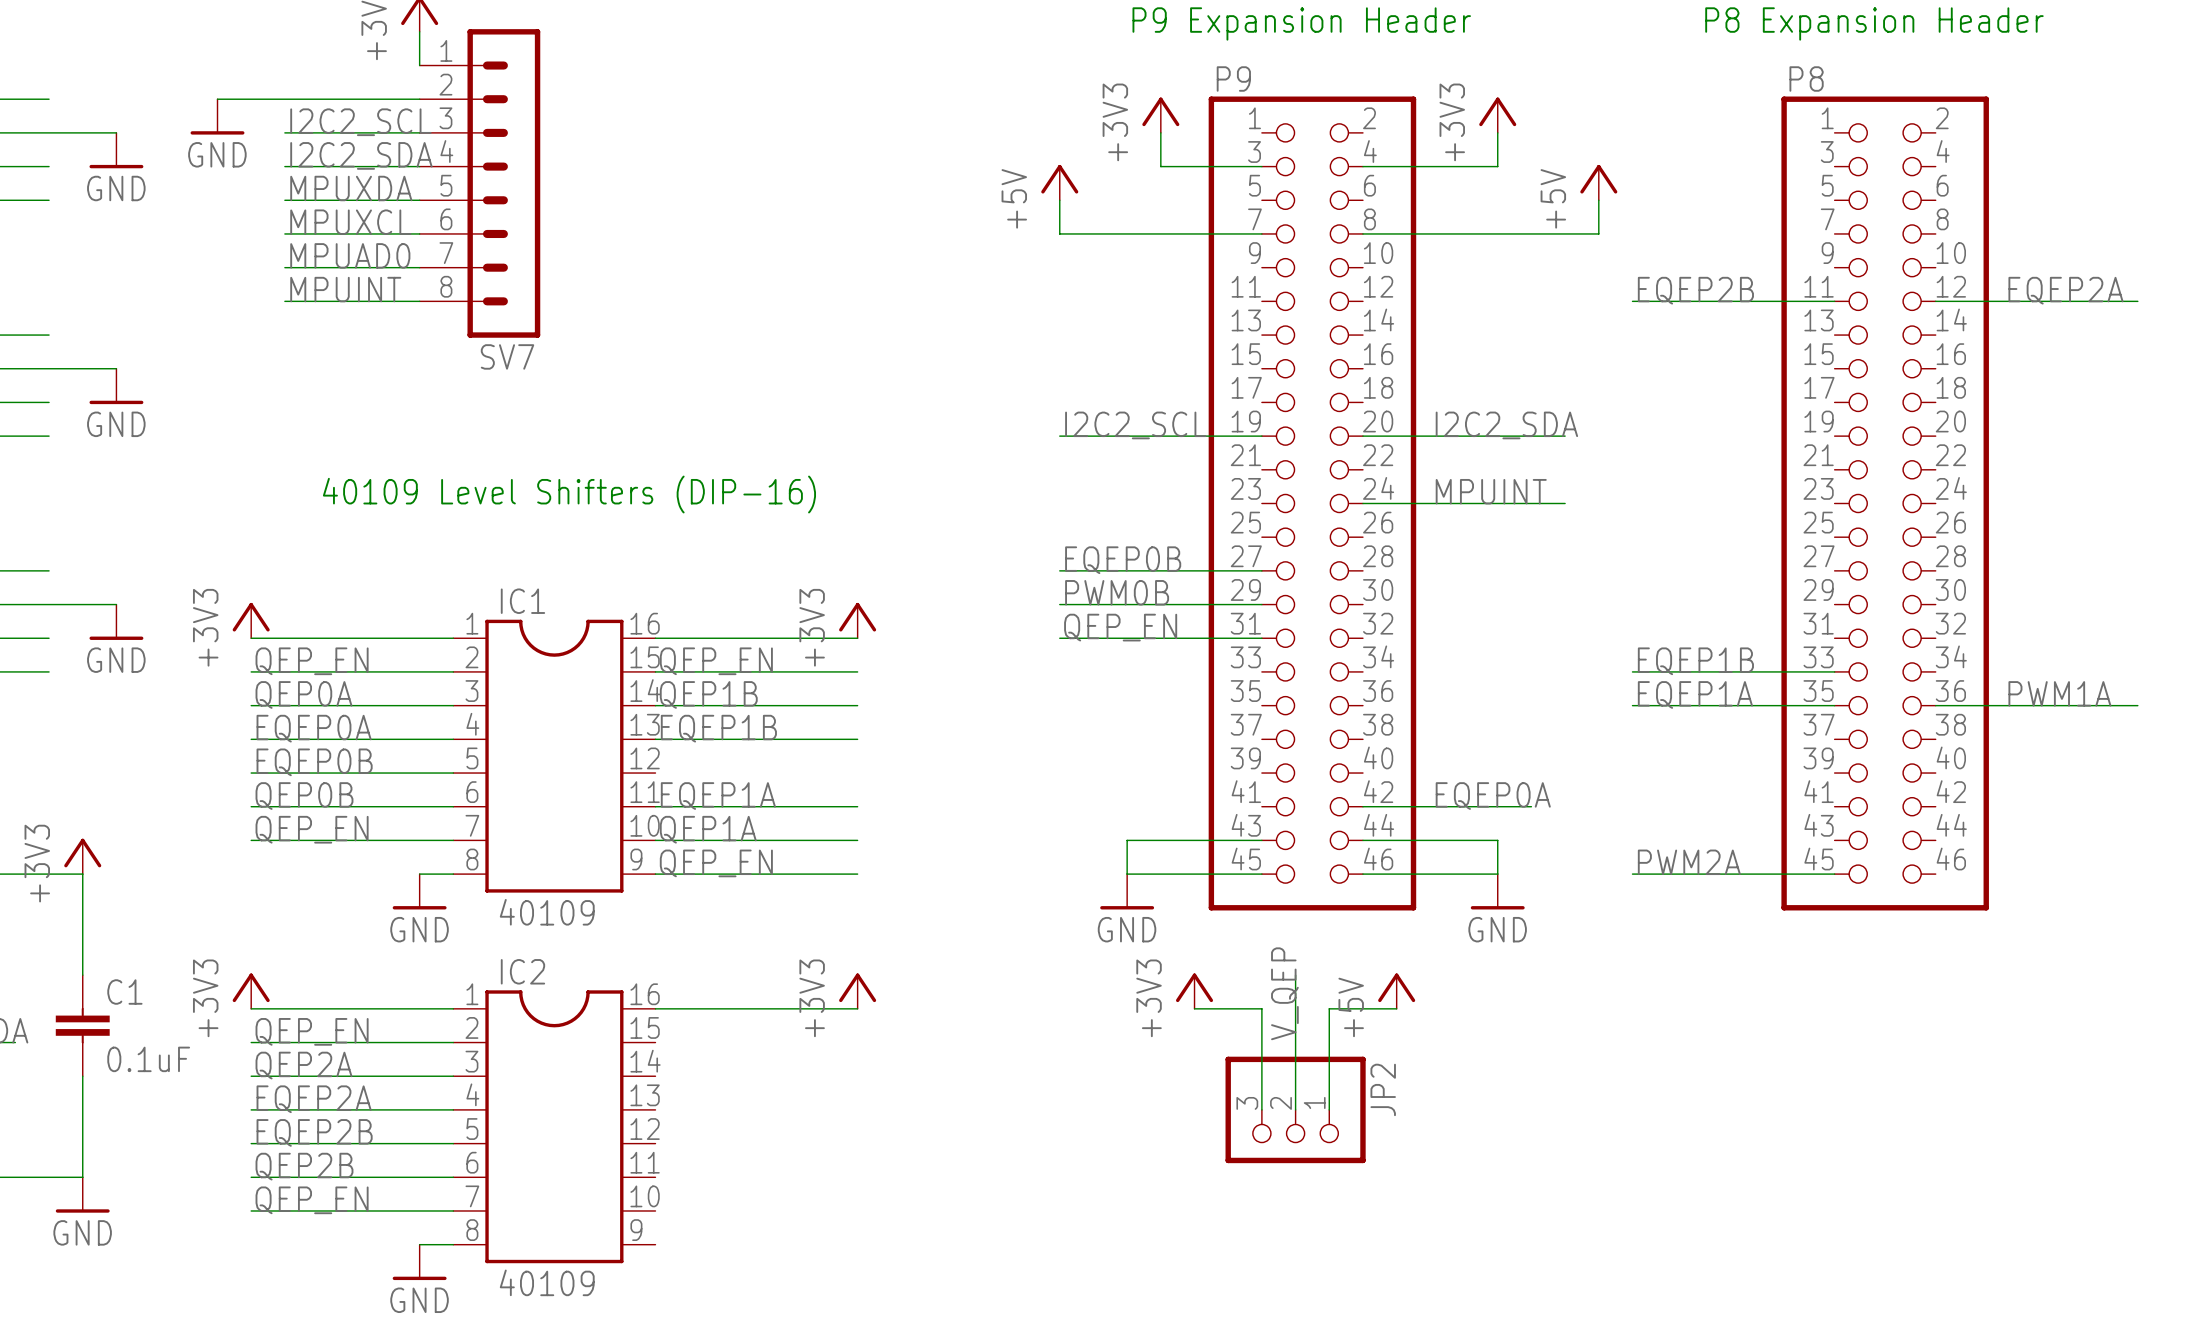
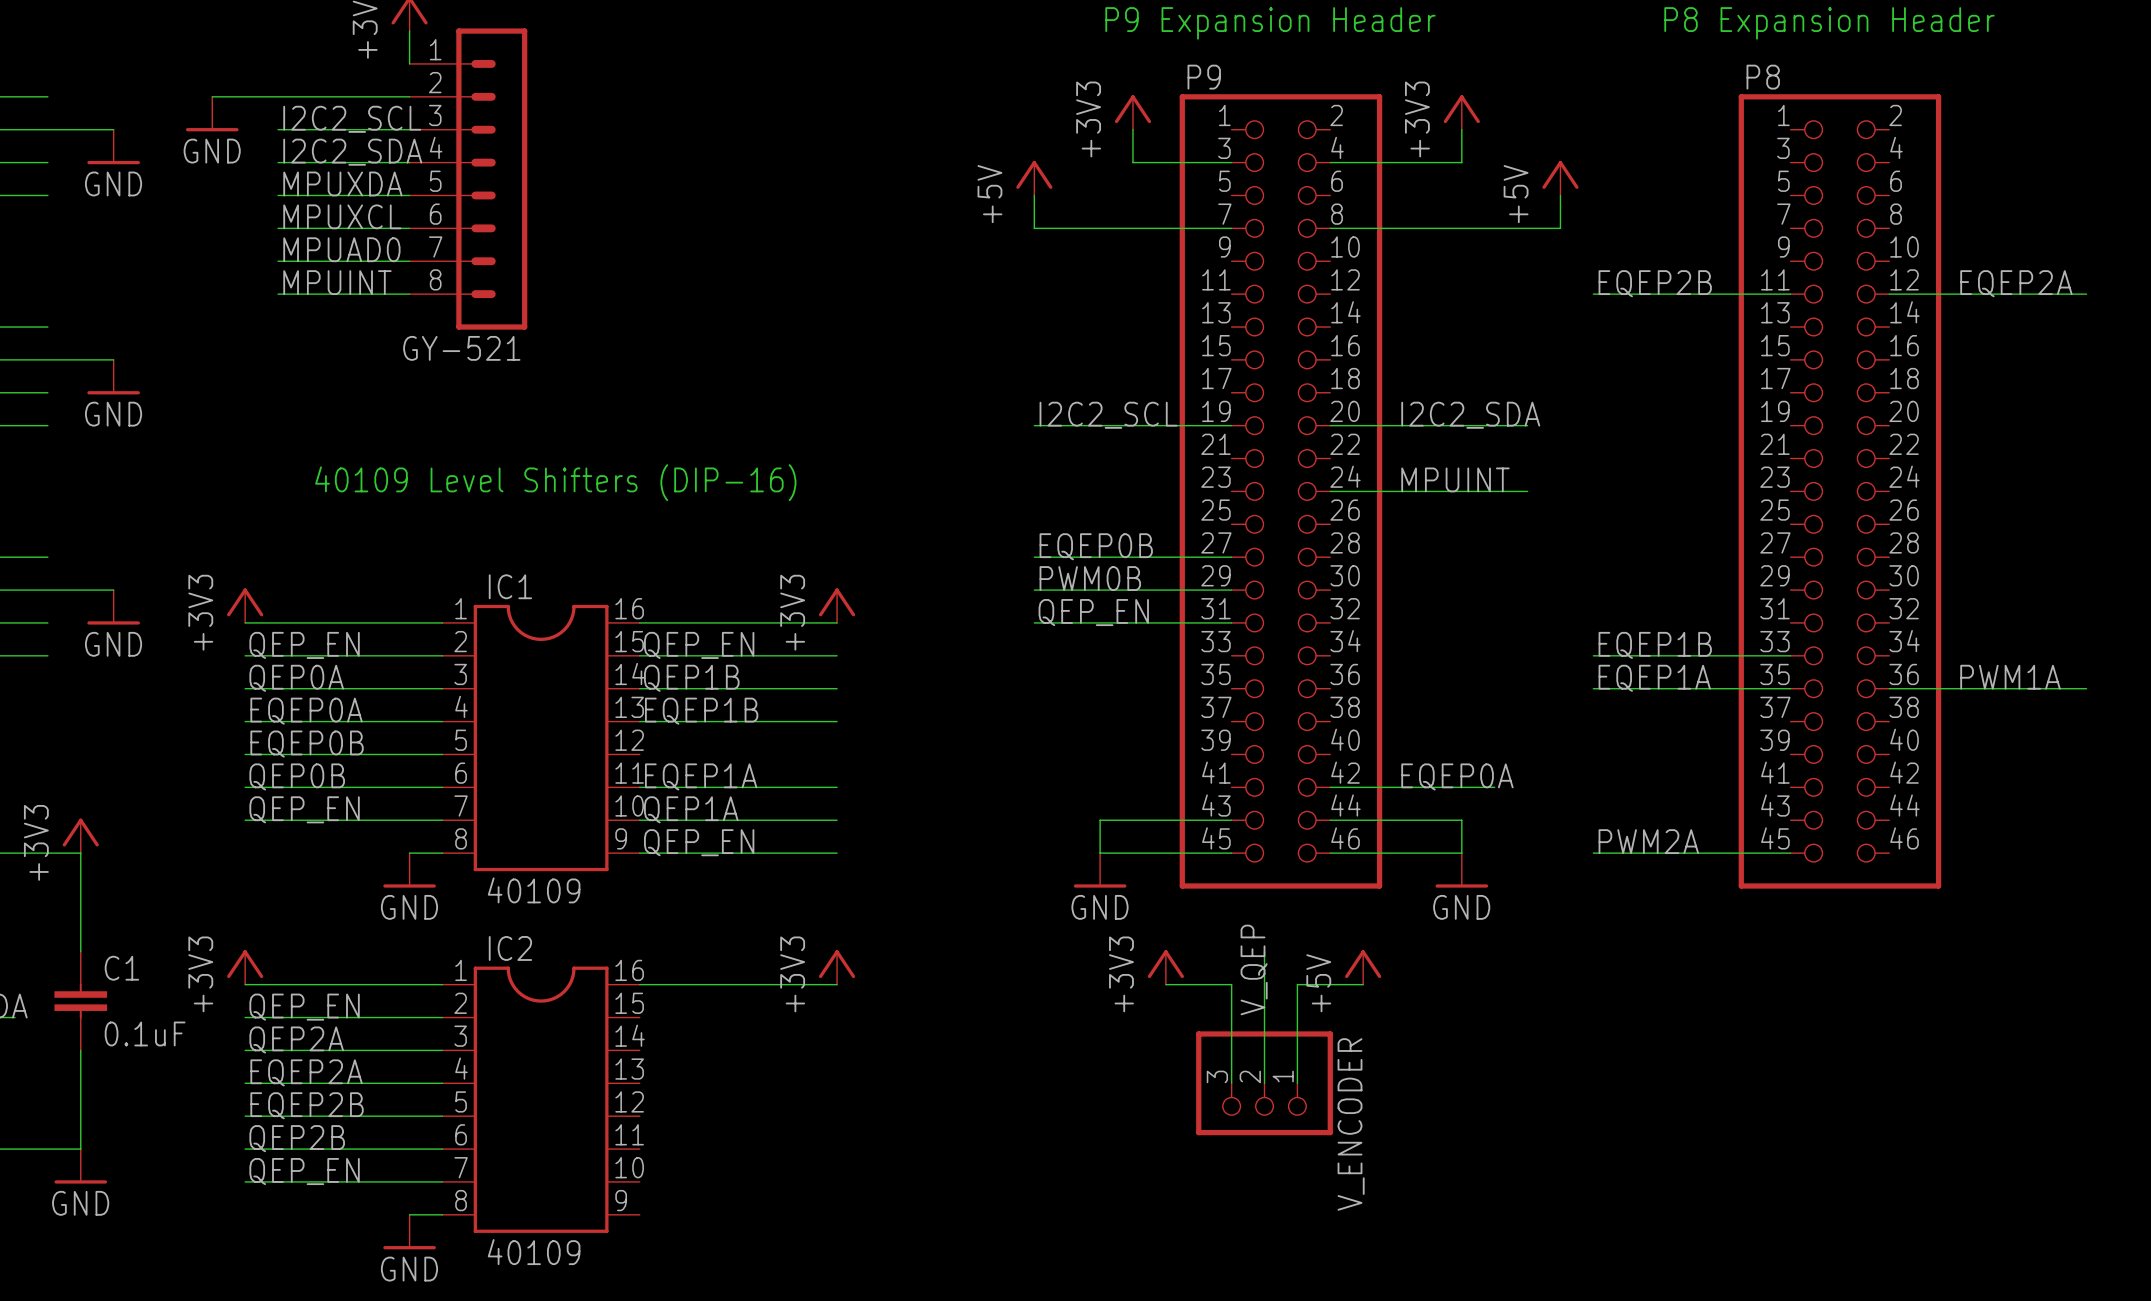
SV7 name: SV7 (507, 356) -> GY-521 (461, 348)
JP2 name: JP2 (1383, 1089) -> V_ENCODER (1351, 1124)

